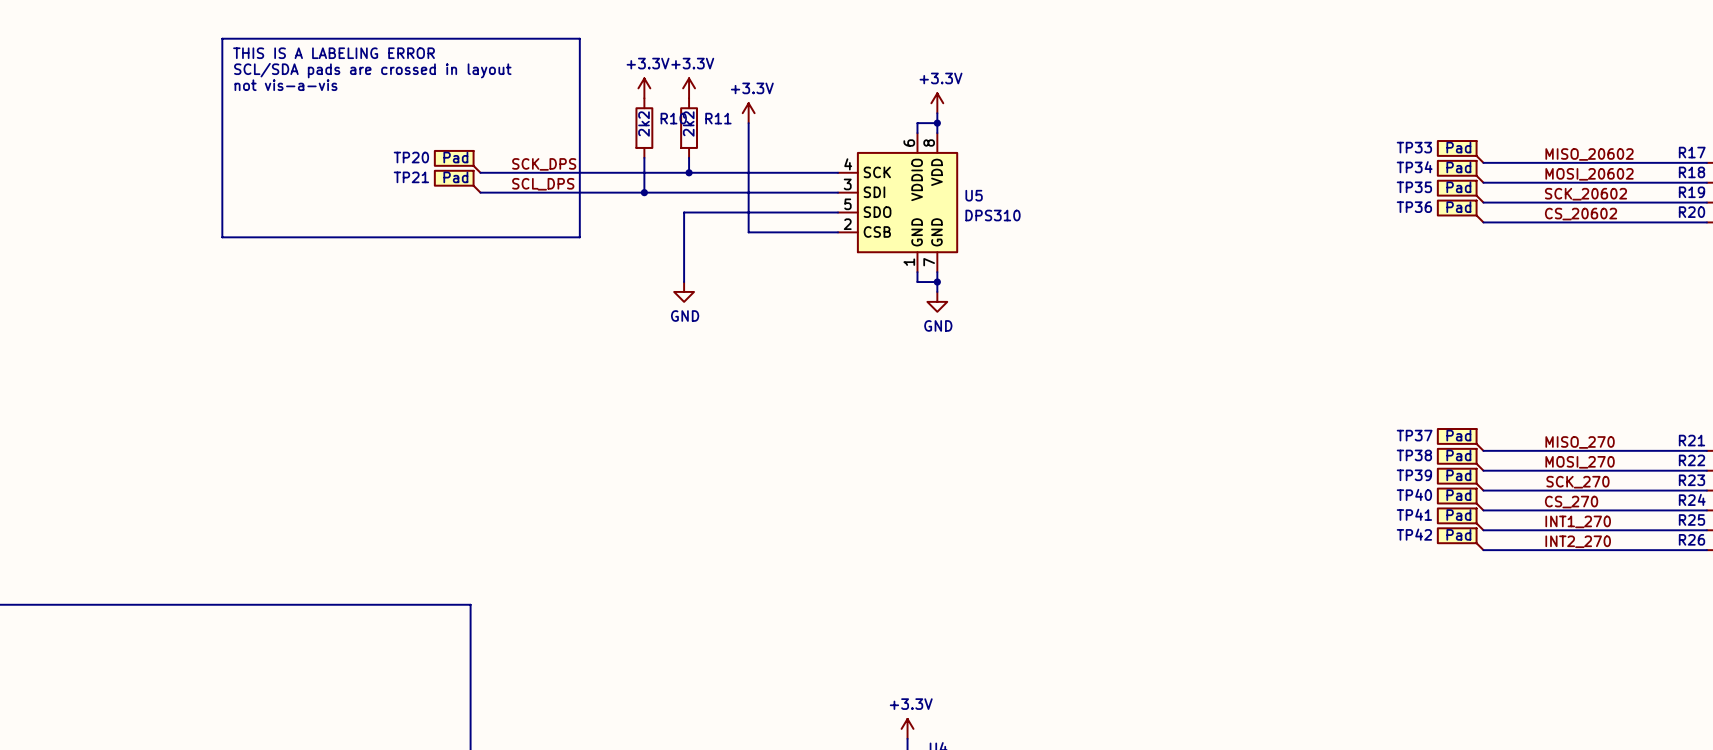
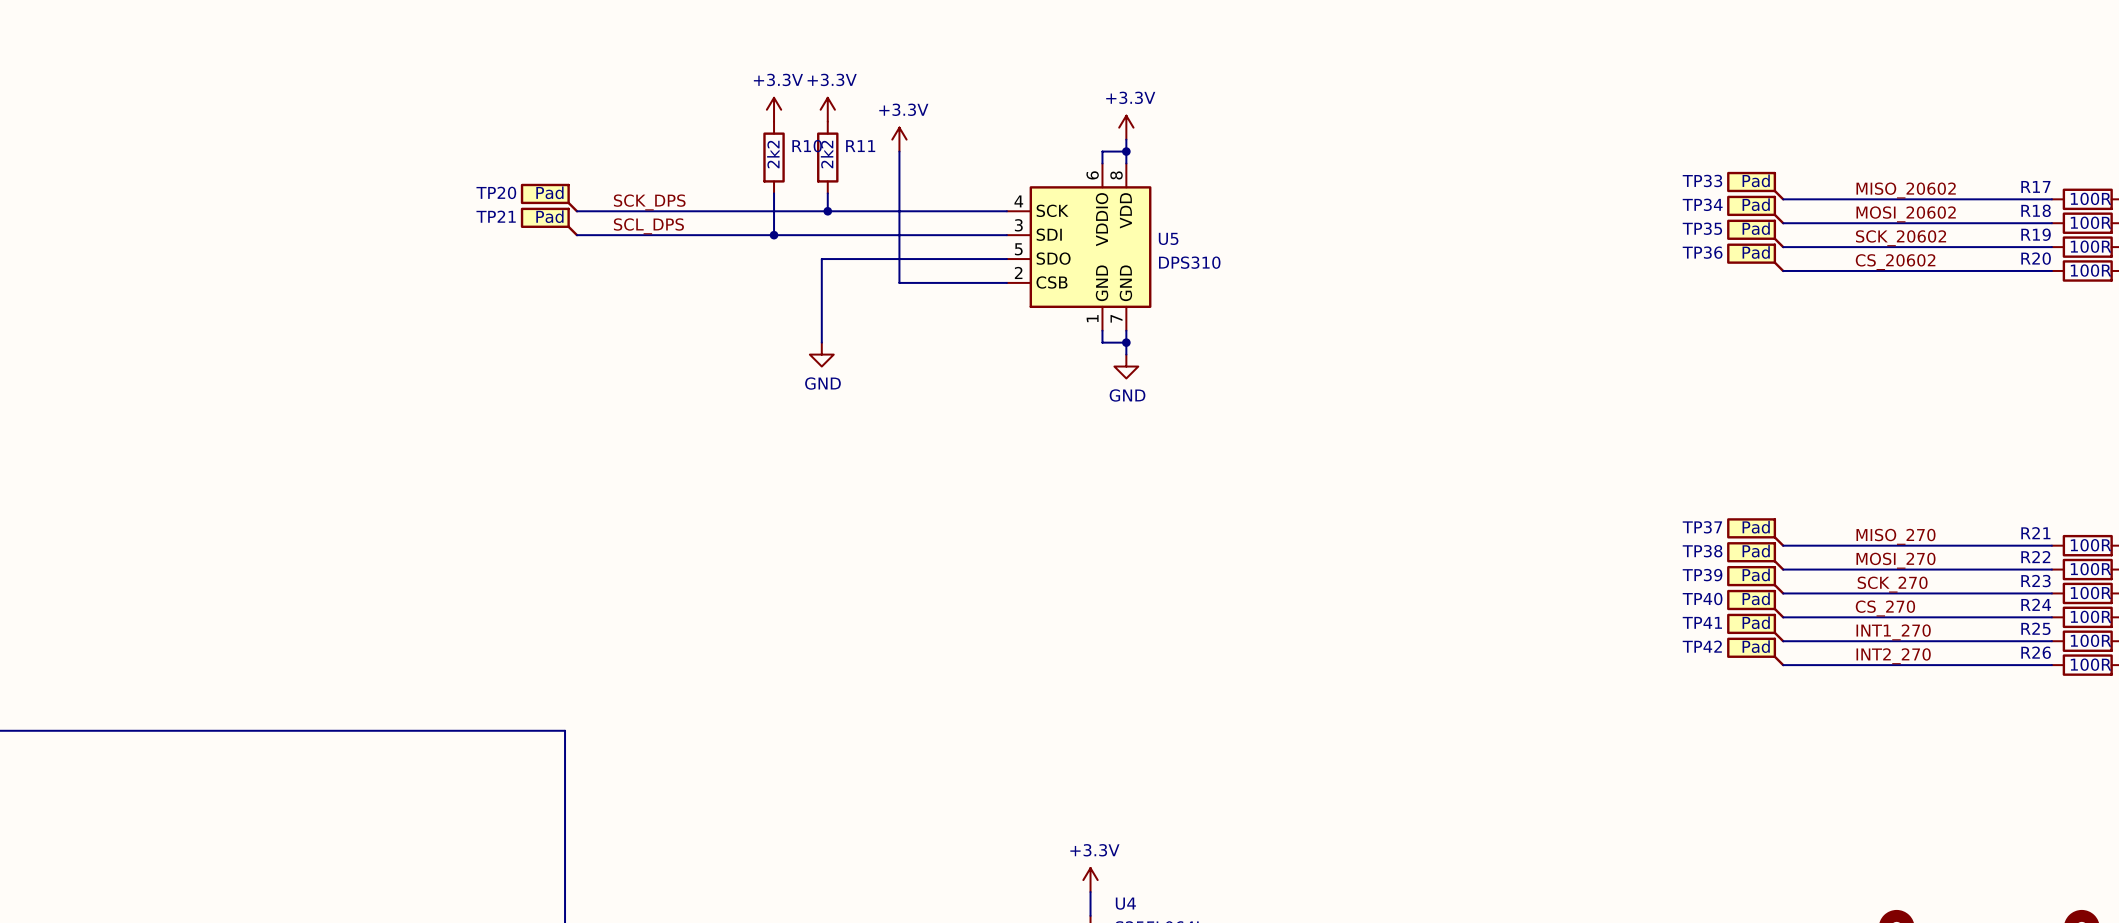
line: (222, 38) (222, 237) (579, 237) (579, 38) (222, 38) -> none
text: THIS IS A LABELING ERROR (334, 53) -> none
text: SCL/SDA pads are crossed in layout (372, 70) -> none
text: not vis-a-vis (286, 85) -> none

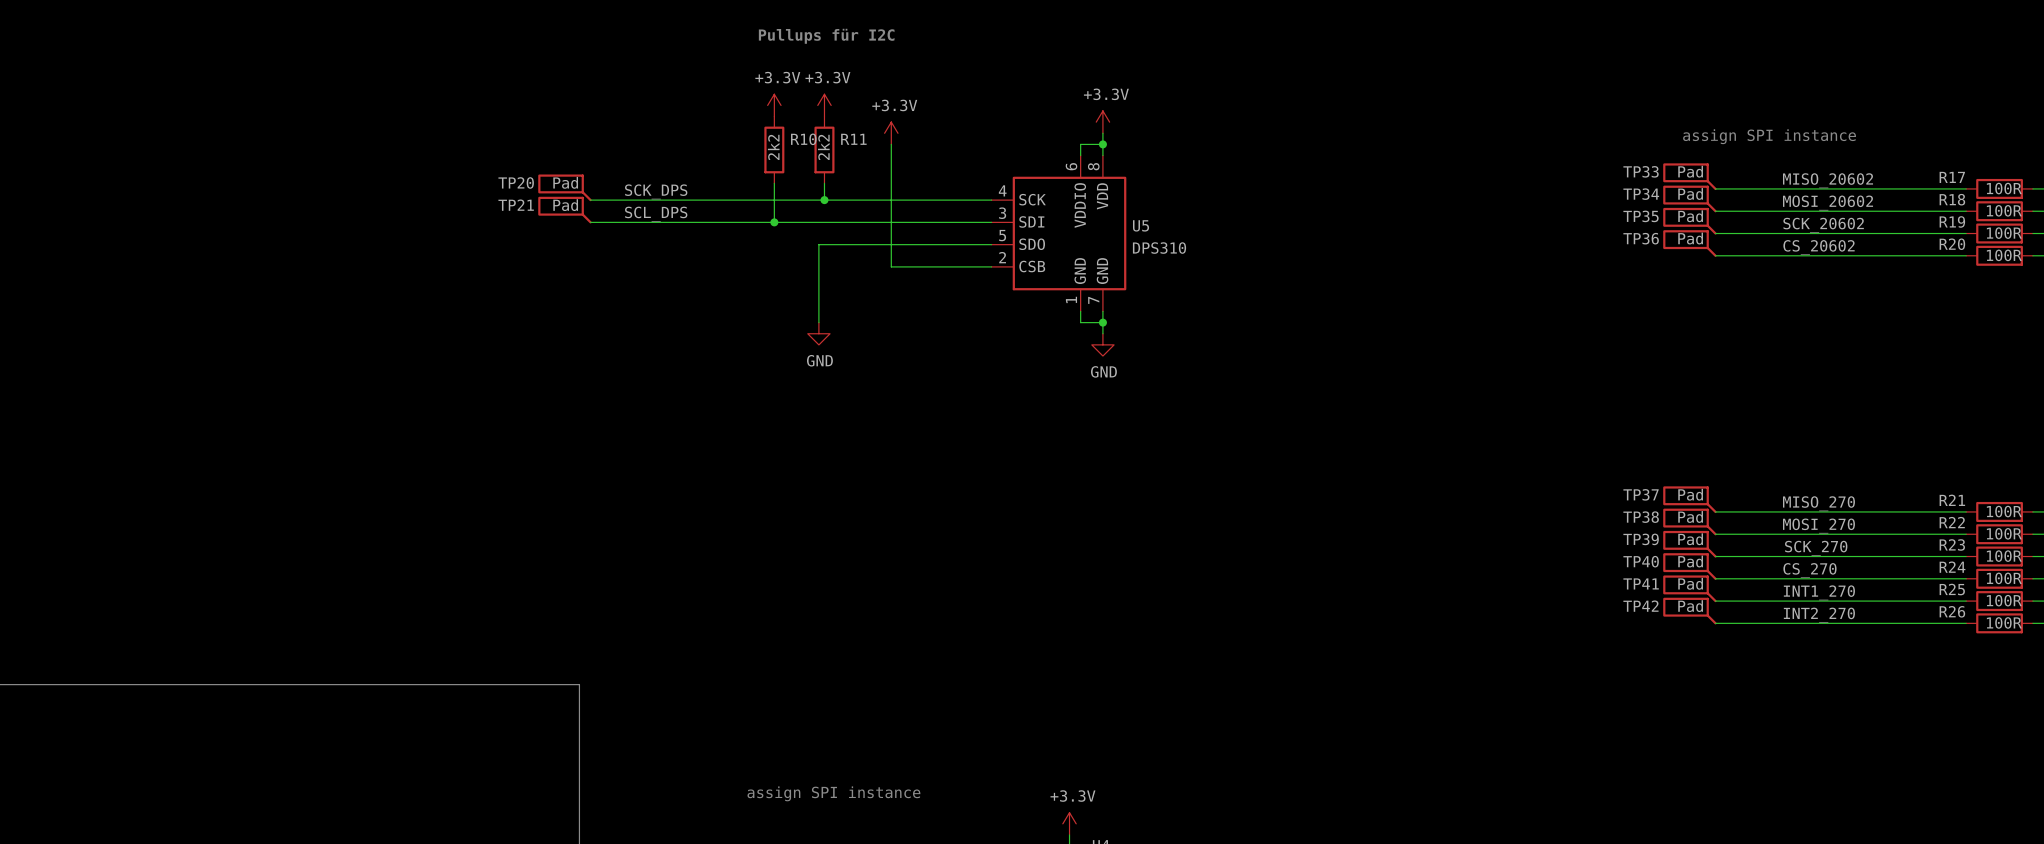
text: none -> Pullups für I2C (826, 36)
text: none -> assign SPI instance (1769, 136)
text: none -> assign SPI instance (833, 793)

